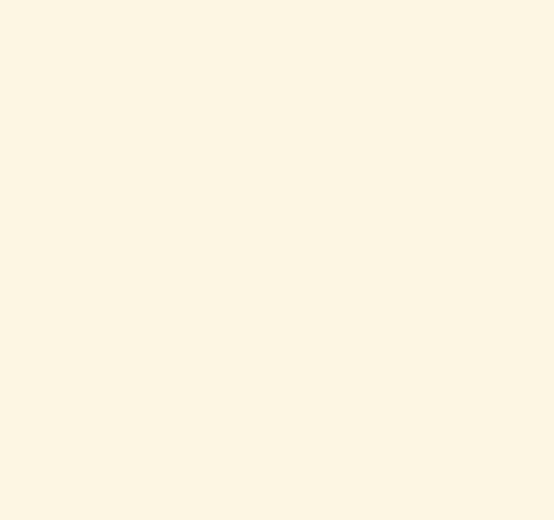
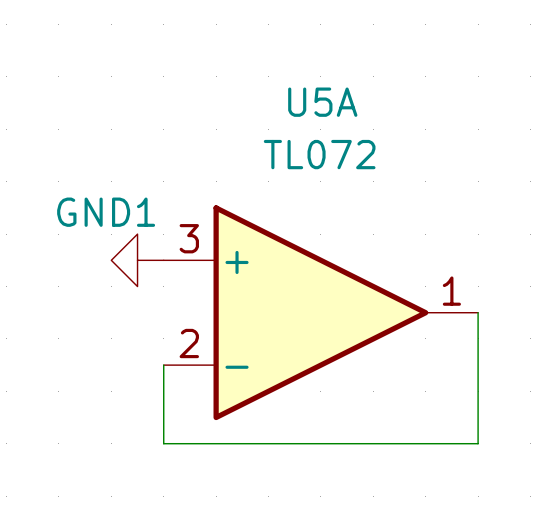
power symbol: none -> GND1 (137, 260)
U5A: none -> TL072 (320, 312)
wire: none -> (478, 312) (478, 443) (163, 443) (163, 365)

